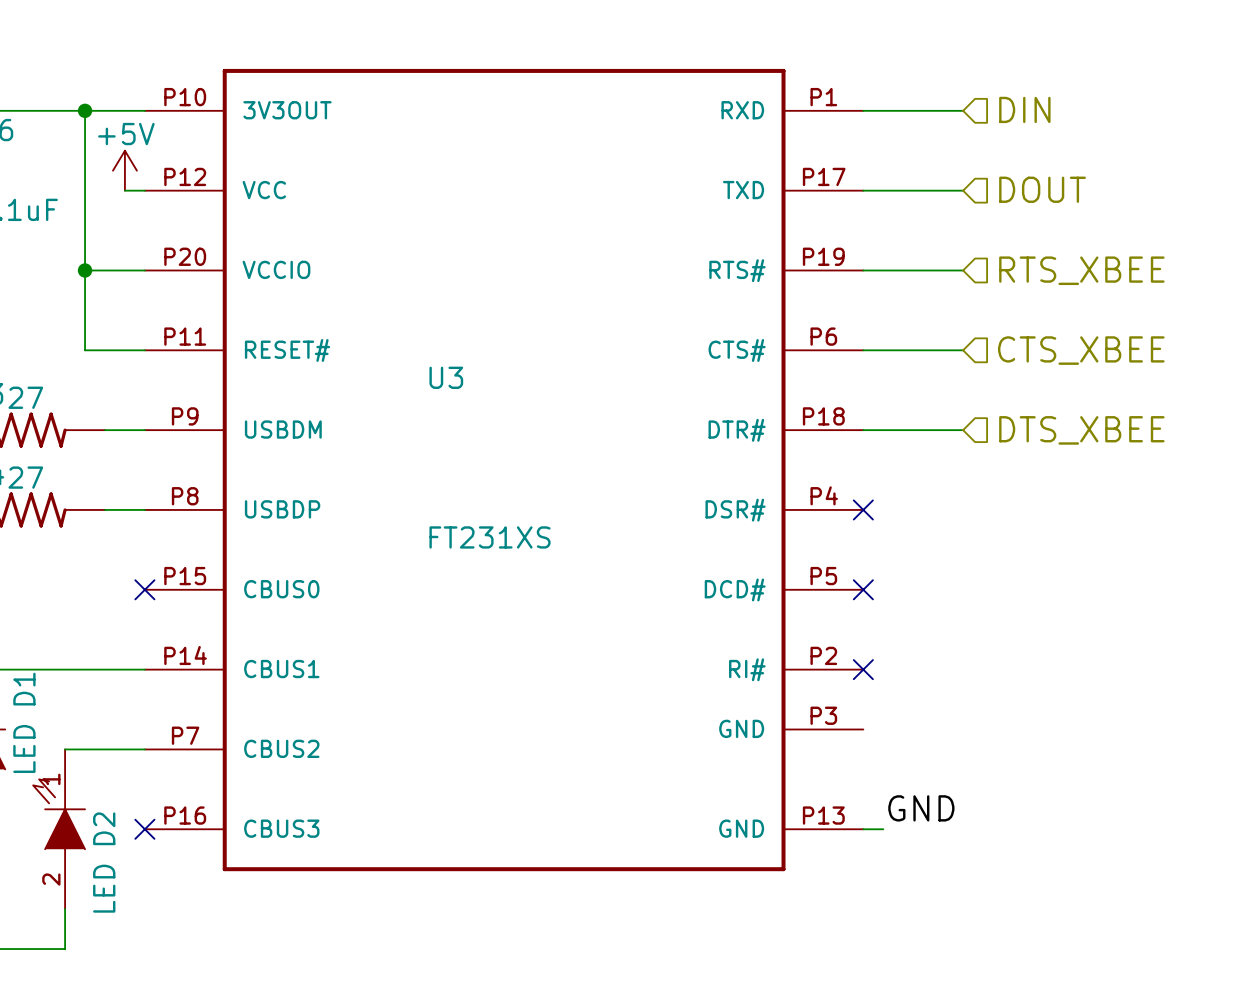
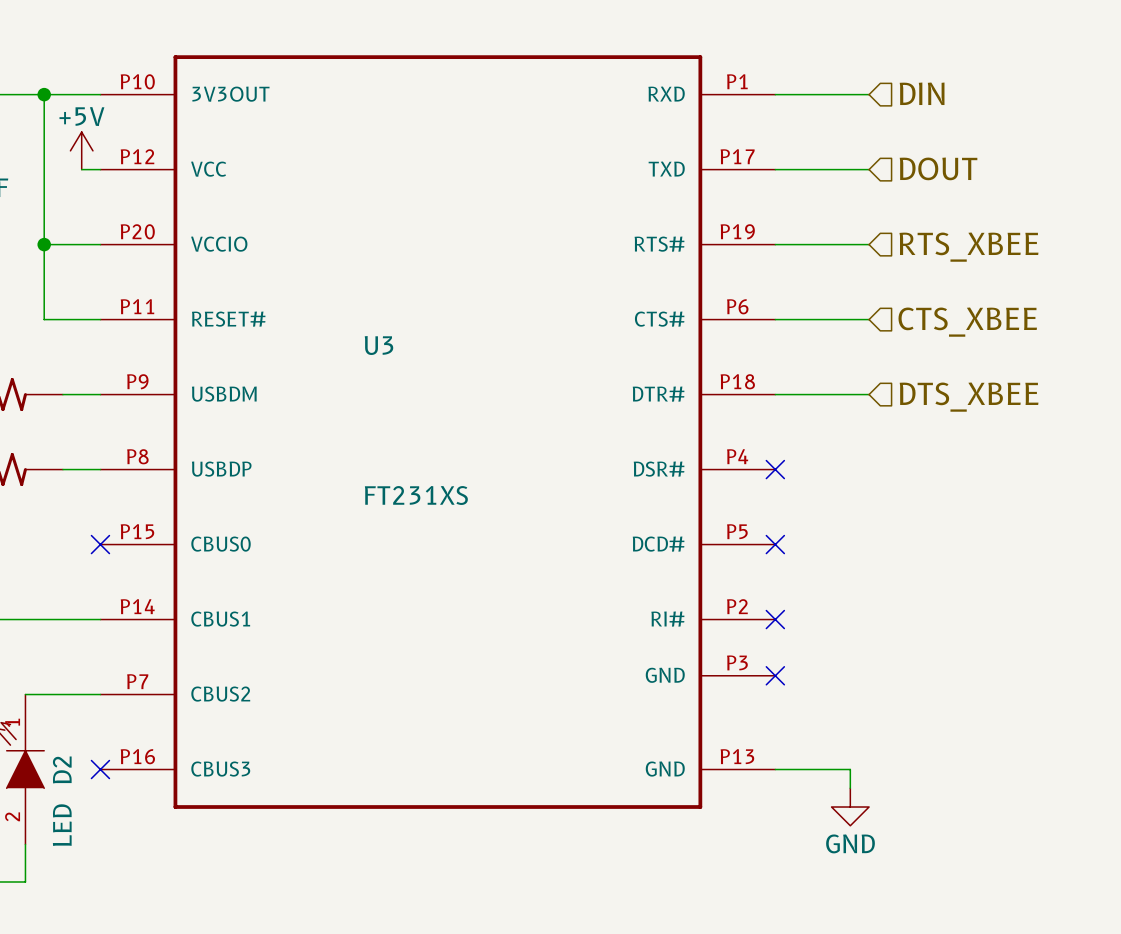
no-connect mark: none -> (775, 675)
label: GND (921, 808) -> none
wire: none -> (794, 769) (850, 769) (850, 788)
power symbol: none -> GND (850, 807)

